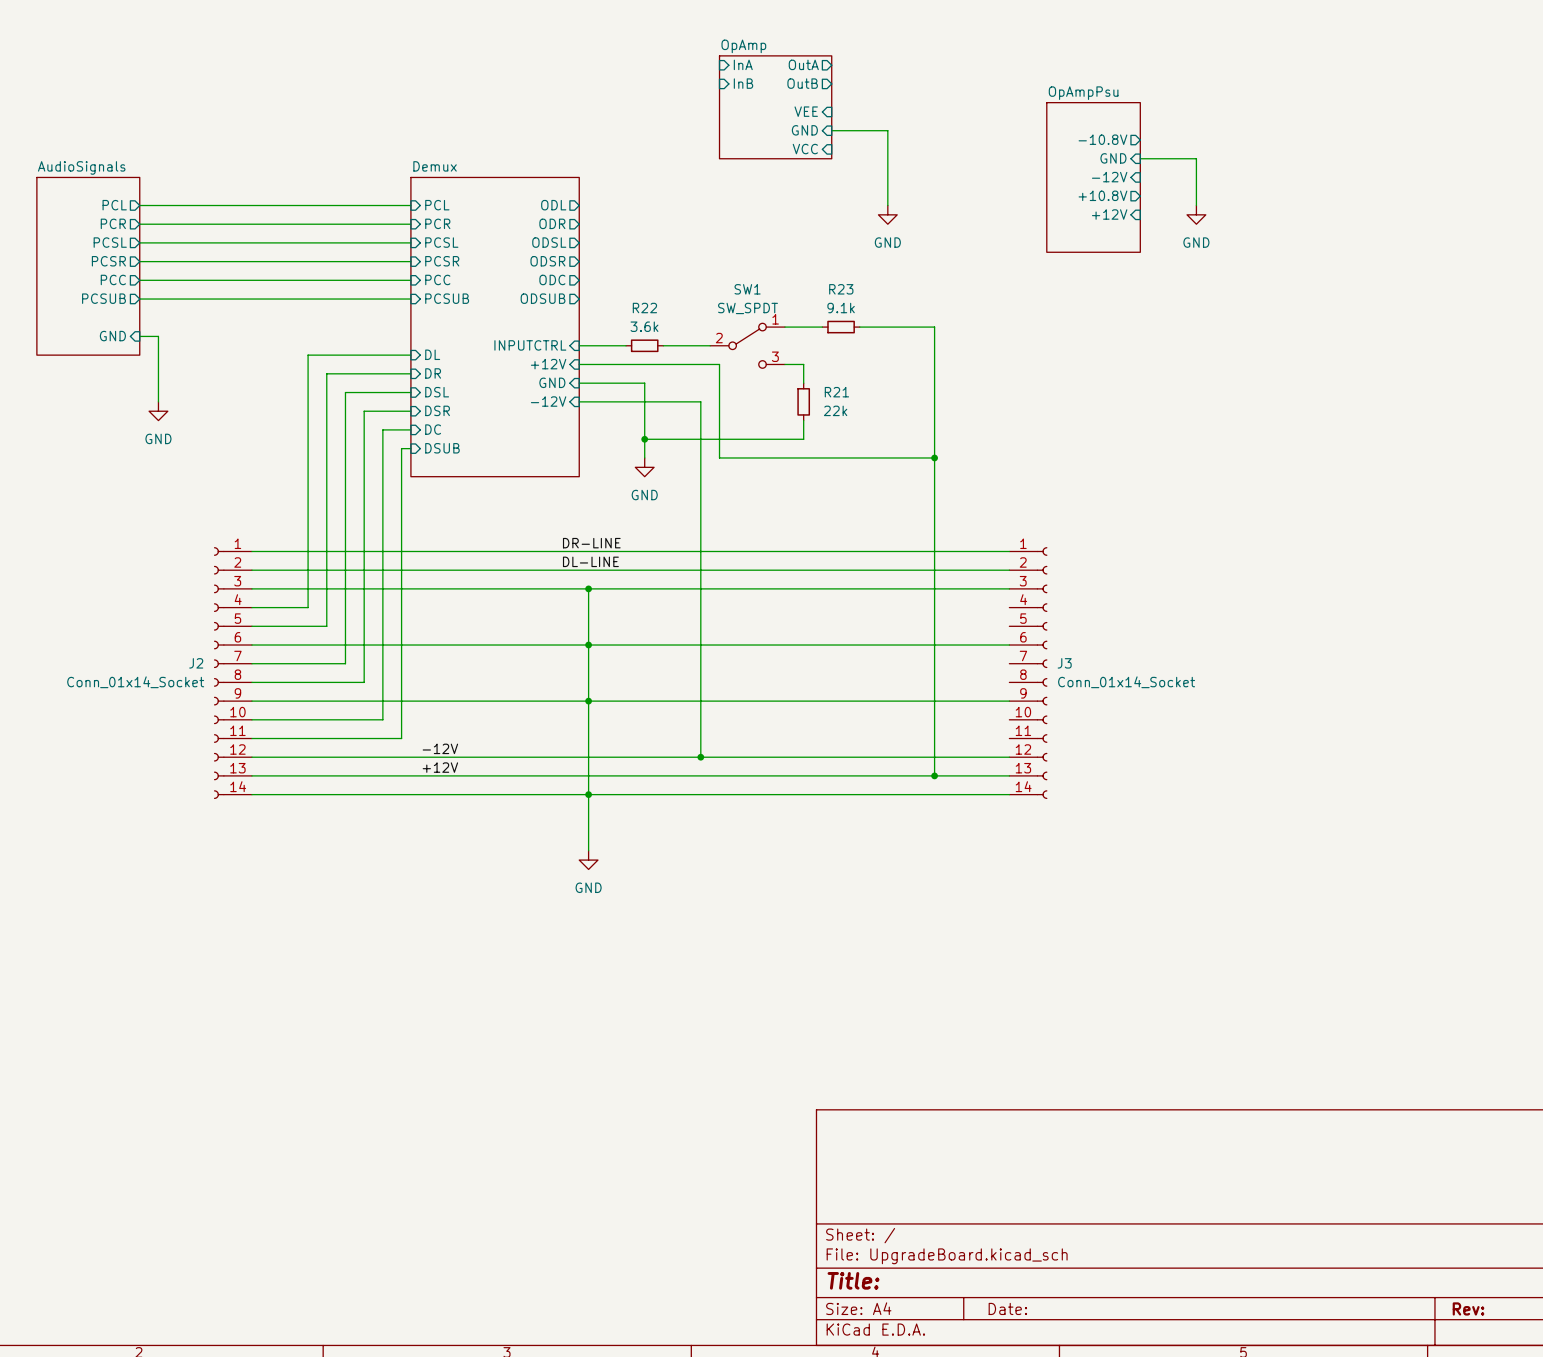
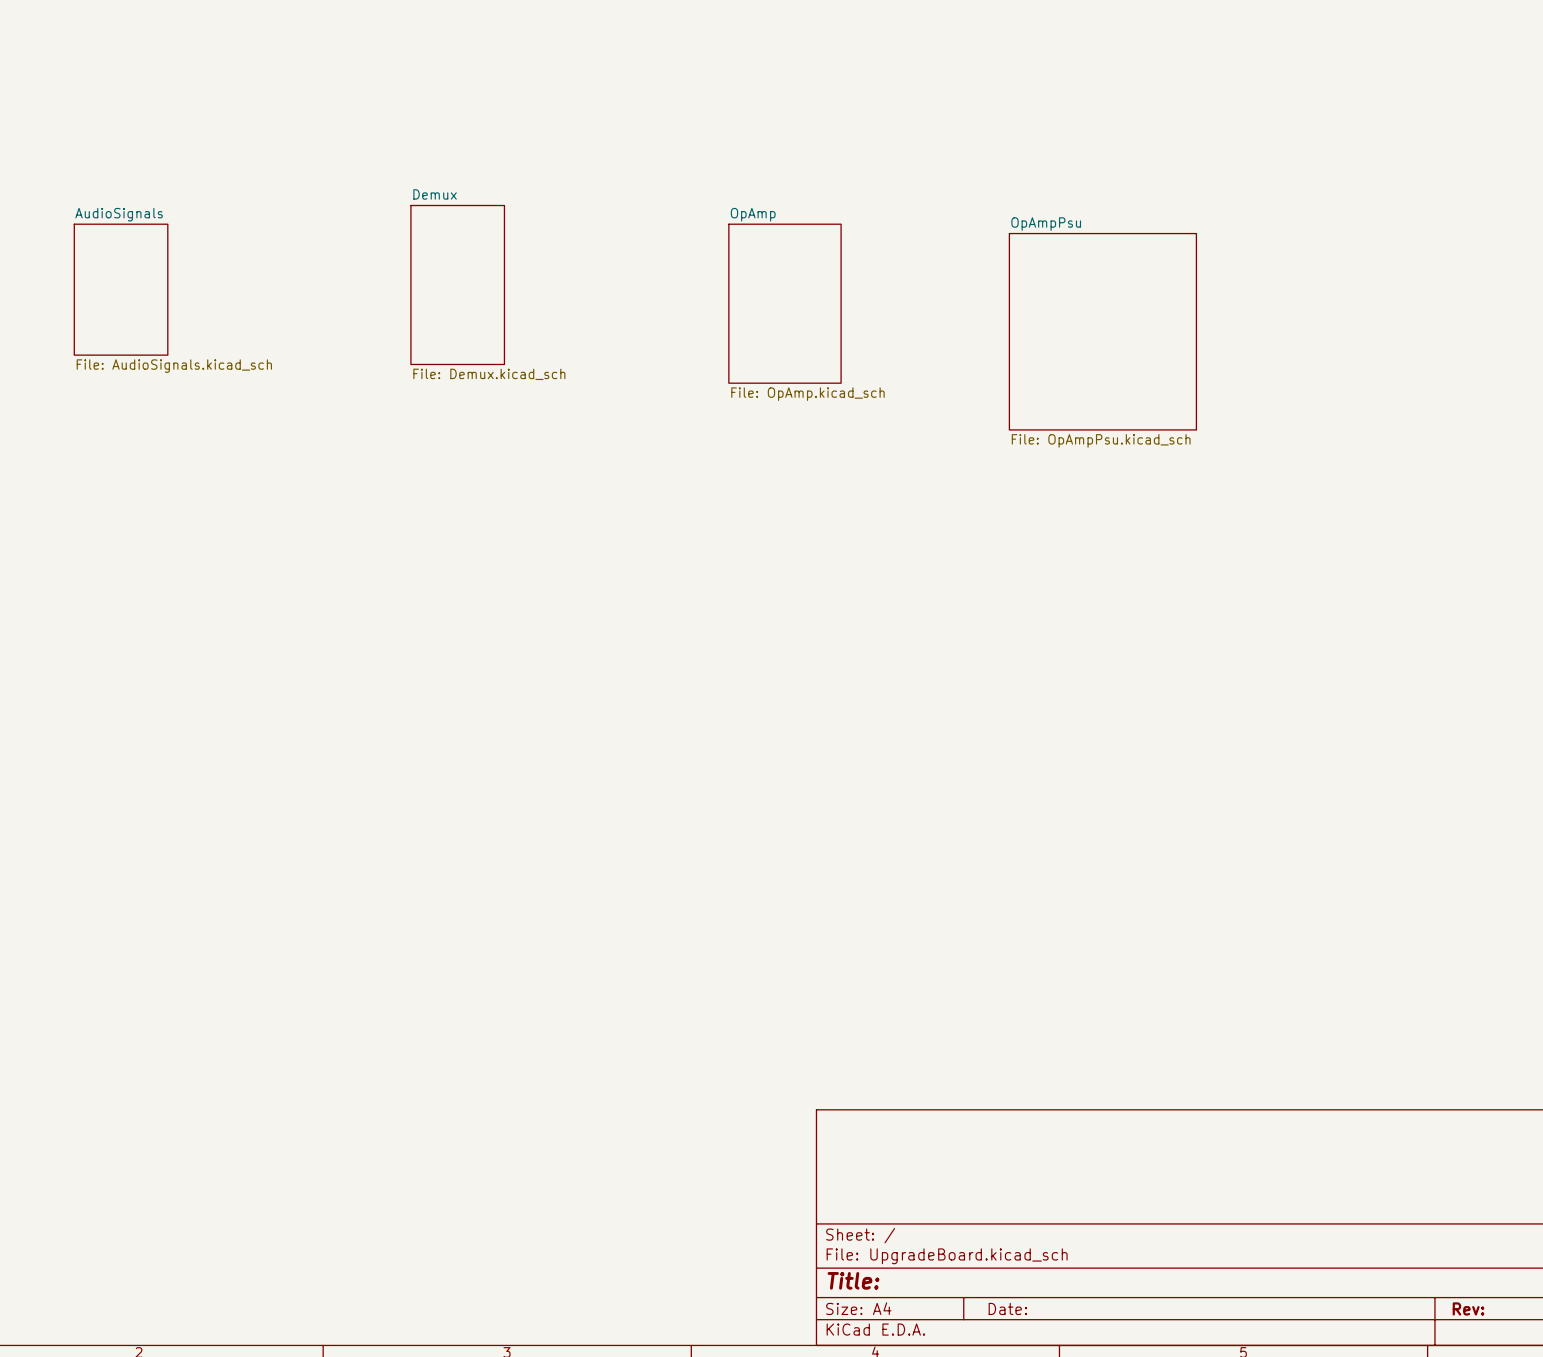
sheet pin: InA (743, 64) -> none
sheet pin: OutA (803, 64) -> none
sheet pin: InB (743, 83) -> none
sheet pin: OutB (802, 83) -> none
sheet OpAmp: (775, 107) -> none
sheet pin: VEE (806, 111) -> none
sheet pin: GND (804, 130) -> none
wire: (831, 130) (887, 130) (887, 205) -> none
sheet pin: -10.8V (1102, 139) -> none
sheet pin: VCC (805, 149) -> none
sheet pin: GND (1113, 158) -> none
wire: (1140, 158) (1196, 158) (1196, 205) -> none
sheet OpAmpPsu: (1093, 177) -> none
sheet pin: -12V (1109, 177) -> none
sheet pin: +10.8V (1102, 195) -> none
sheet pin: PCL (114, 205) -> none
wire: (139, 205) (410, 205) -> none
sheet pin: PCL (437, 205) -> none
sheet pin: ODL (553, 205) -> none
power symbol: GND (887, 214) -> none
sheet pin: +12V (1109, 214) -> none
power symbol: GND (1196, 214) -> none
sheet pin: PCR (113, 223) -> none
sheet pin: PCR (437, 223) -> none
sheet pin: ODR (552, 223) -> none
wire: (139, 224) (410, 224) -> none
sheet pin: PCSL (110, 242) -> none
wire: (139, 242) (410, 242) -> none
sheet pin: PCSL (441, 242) -> none
sheet pin: ODSL (549, 242) -> none
sheet pin: PCSR (108, 261) -> none
wire: (139, 261) (410, 261) -> none
sheet pin: PCSR (442, 261) -> none
sheet pin: ODSR (547, 261) -> none
sheet AudioSignals: (88, 266) -> none
sheet pin: PCC (113, 279) -> none
sheet pin: PCC (437, 279) -> none
sheet pin: ODC (552, 279) -> none
wire: (139, 280) (410, 280) -> none
sheet Demux: none -> File: Demux.kicad_sch (457, 284)
sheet AudioSignals: none -> File: AudioSignals.kicad_sch (121, 289)
sheet pin: PCSUB (103, 298) -> none
sheet pin: PCSUB (447, 298) -> none
sheet pin: ODSUB (543, 298) -> none
wire: (139, 299) (410, 299) -> none
sheet OpAmp: none -> File: OpAmp.kicad_sch (784, 303)
sheet Demux: (495, 327) -> none
wire: (784, 327) (822, 327) -> none
R23: 9.1k (841, 327) -> none
wire: (859, 327) (934, 327) (934, 775) -> none
sheet OpAmpPsu: none -> File: OpAmpPsu.kicad_sch (1102, 331)
sheet pin: GND (112, 336) -> none
wire: (139, 336) (158, 336) (158, 401) -> none
sheet pin: INPUTCTRL (530, 345) -> none
wire: (579, 345) (626, 345) -> none
R22: 3.6k (644, 345) -> none
wire: (663, 345) (710, 345) -> none
SW1: SW_SPDT (747, 345) -> none
sheet pin: DL (432, 354) -> none
wire: (410, 355) (308, 355) (308, 607) (251, 607) -> none
sheet pin: +12V (548, 364) -> none
wire: (579, 364) (719, 364) (719, 457) (934, 457) -> none
wire: (784, 364) (803, 364) (803, 383) -> none
wire: (410, 373) (326, 373) (326, 626) (251, 626) -> none
sheet pin: DR (433, 373) -> none
sheet pin: GND (552, 382) -> none
wire: (579, 383) (644, 383) (644, 457) -> none
wire: (410, 392) (345, 392) (345, 663) (251, 663) -> none
sheet pin: DSL (437, 392) -> none
sheet pin: -12V (548, 401) -> none
wire: (579, 401) (700, 401) (700, 757) -> none
R21: 22k (803, 401) -> none
sheet pin: DSR (437, 410) -> none
power symbol: GND (158, 411) -> none
wire: (410, 411) (364, 411) (364, 682) (251, 682) -> none
wire: (803, 420) (803, 439) (644, 439) -> none
wire: (410, 429) (382, 429) (382, 719) (251, 719) -> none
sheet pin: DC (433, 429) -> none
junction: (644, 439) -> none
wire: (410, 448) (401, 448) (401, 738) (251, 738) -> none
sheet pin: DSUB (442, 448) -> none
junction: (934, 457) -> none
power symbol: GND (644, 467) -> none
label: DR-LINE (591, 543) -> none
wire: (251, 551) (1009, 551) -> none
label: DL-LINE (590, 561) -> none
wire: (251, 570) (1009, 570) -> none
wire: (251, 588) (1009, 588) -> none
wire: (588, 588) (588, 850) -> none
junction: (588, 588) -> none
wire: (251, 645) (1009, 645) -> none
junction: (588, 645) -> none
J2: Conn_01x14_Socket (232, 673) -> none
J3: Conn_01x14_Socket (1028, 673) -> none
wire: (251, 701) (1009, 701) -> none
junction: (588, 701) -> none
label: -12V (440, 748) -> none
wire: (251, 757) (1009, 757) -> none
junction: (700, 757) -> none
label: +12V (440, 767) -> none
wire: (251, 775) (1009, 775) -> none
junction: (934, 775) -> none
wire: (251, 794) (1009, 794) -> none
junction: (588, 794) -> none
power symbol: GND (588, 860) -> none

